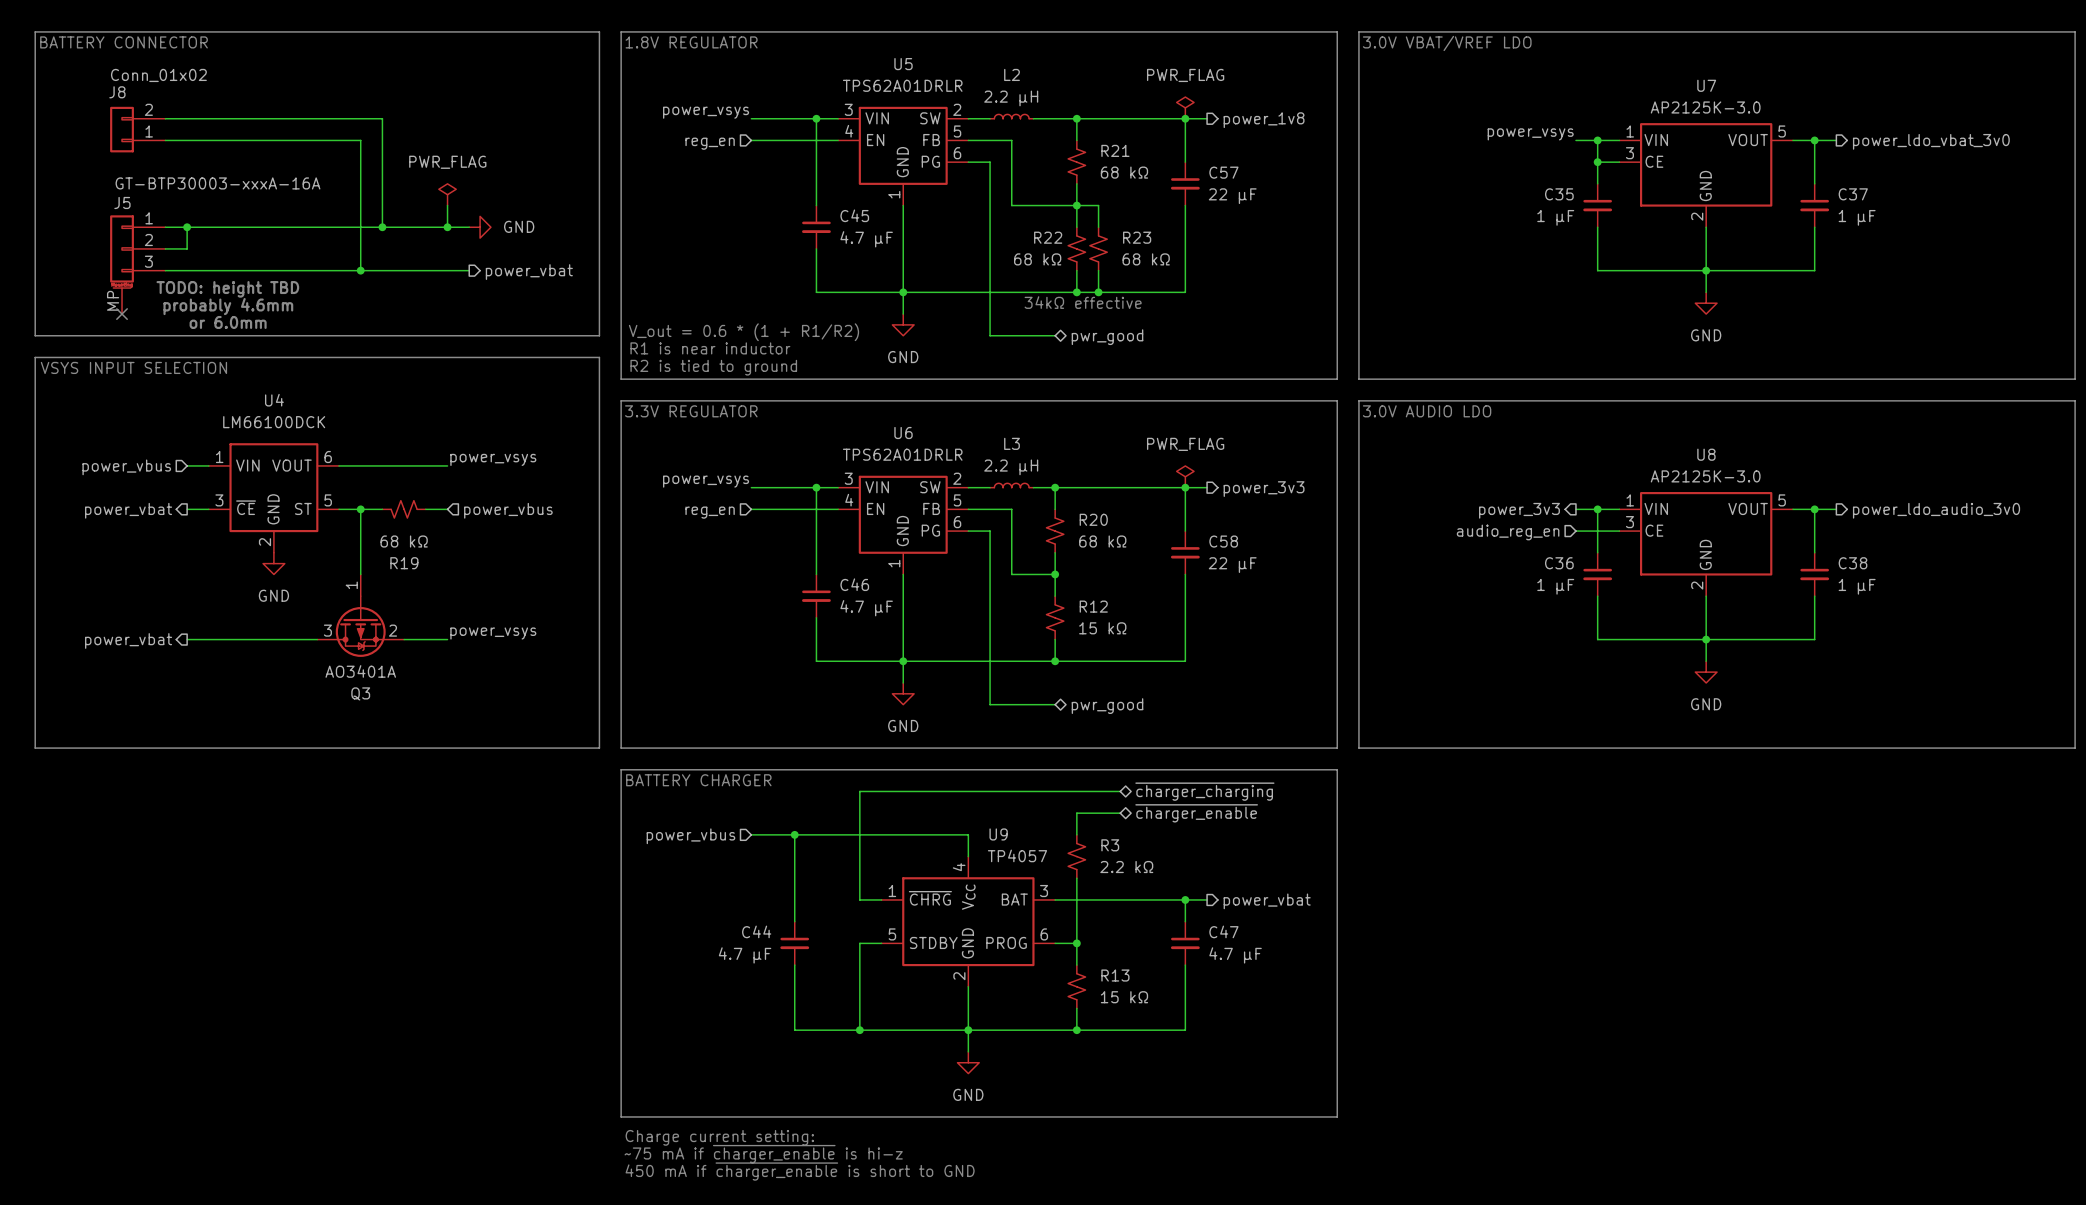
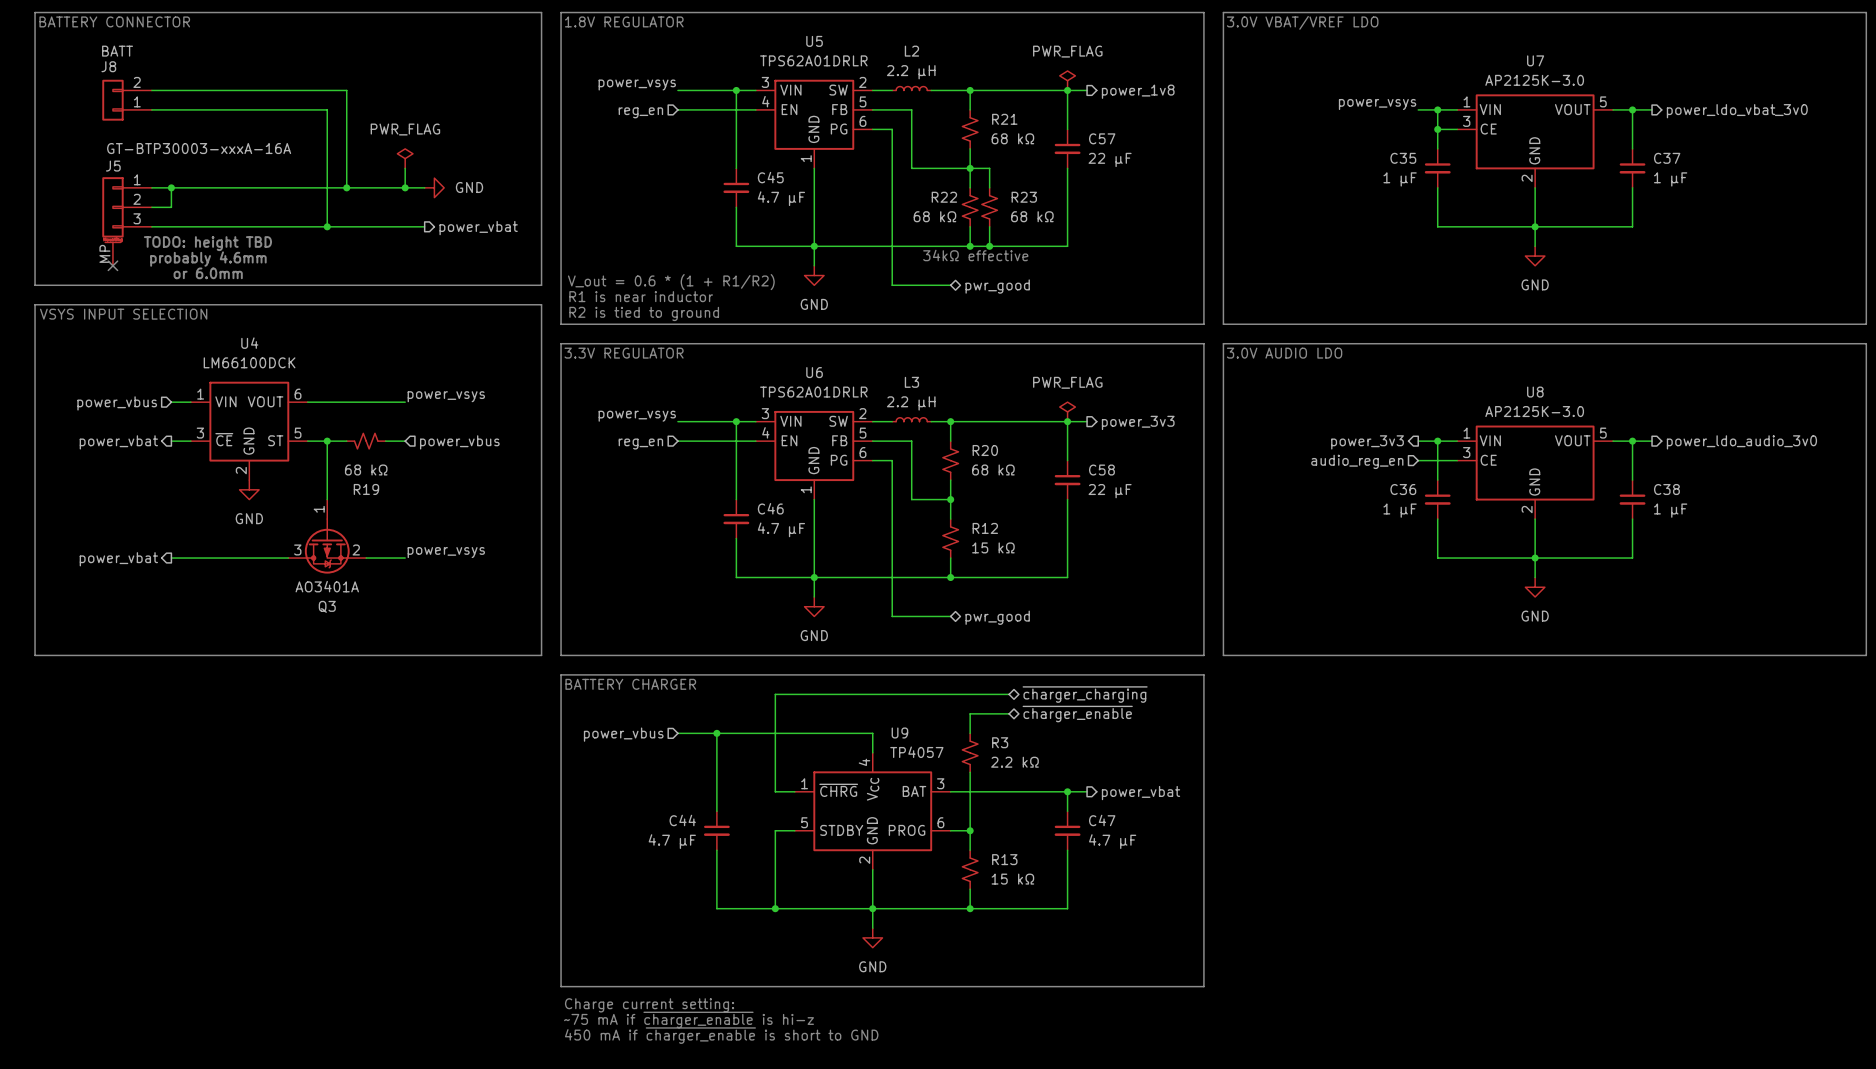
J8 value: Conn_01x02 (158, 75) -> BATT (117, 51)

